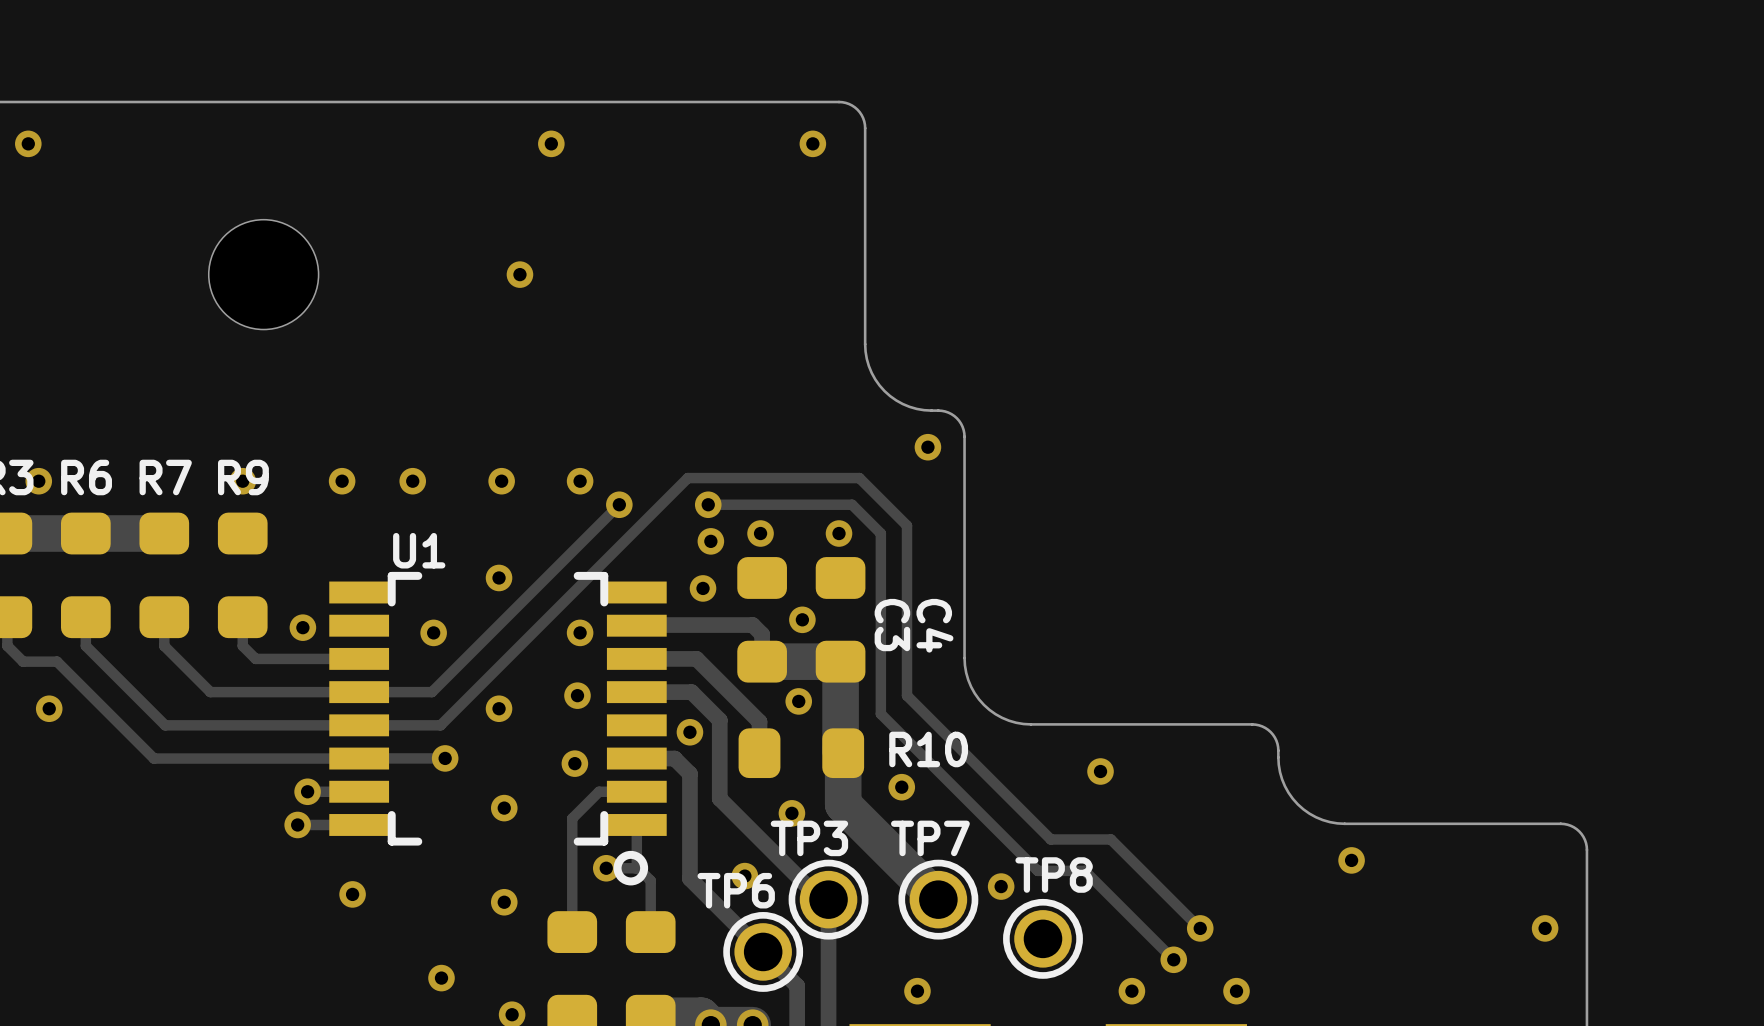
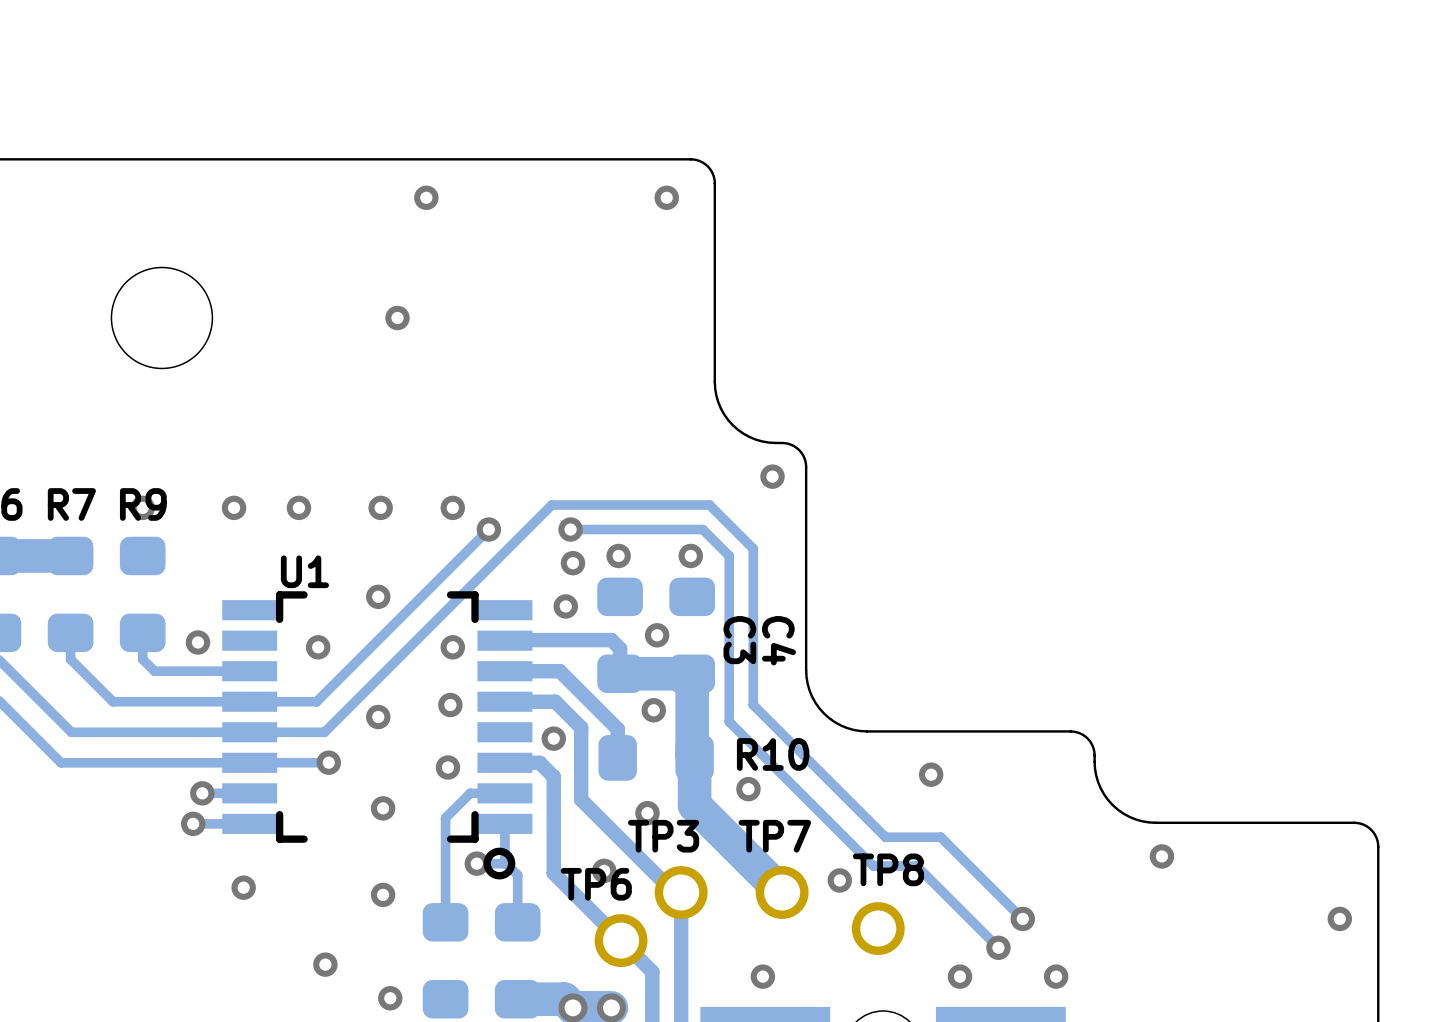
TP3 footprint: [788, 859, 869, 940] -> [654, 866, 708, 919]
TP7 footprint: [898, 859, 979, 940] -> [755, 866, 809, 919]
TP8 footprint: [1003, 898, 1083, 979] -> [851, 902, 905, 956]
TP6 footprint: [723, 912, 804, 992] -> [594, 914, 648, 968]

